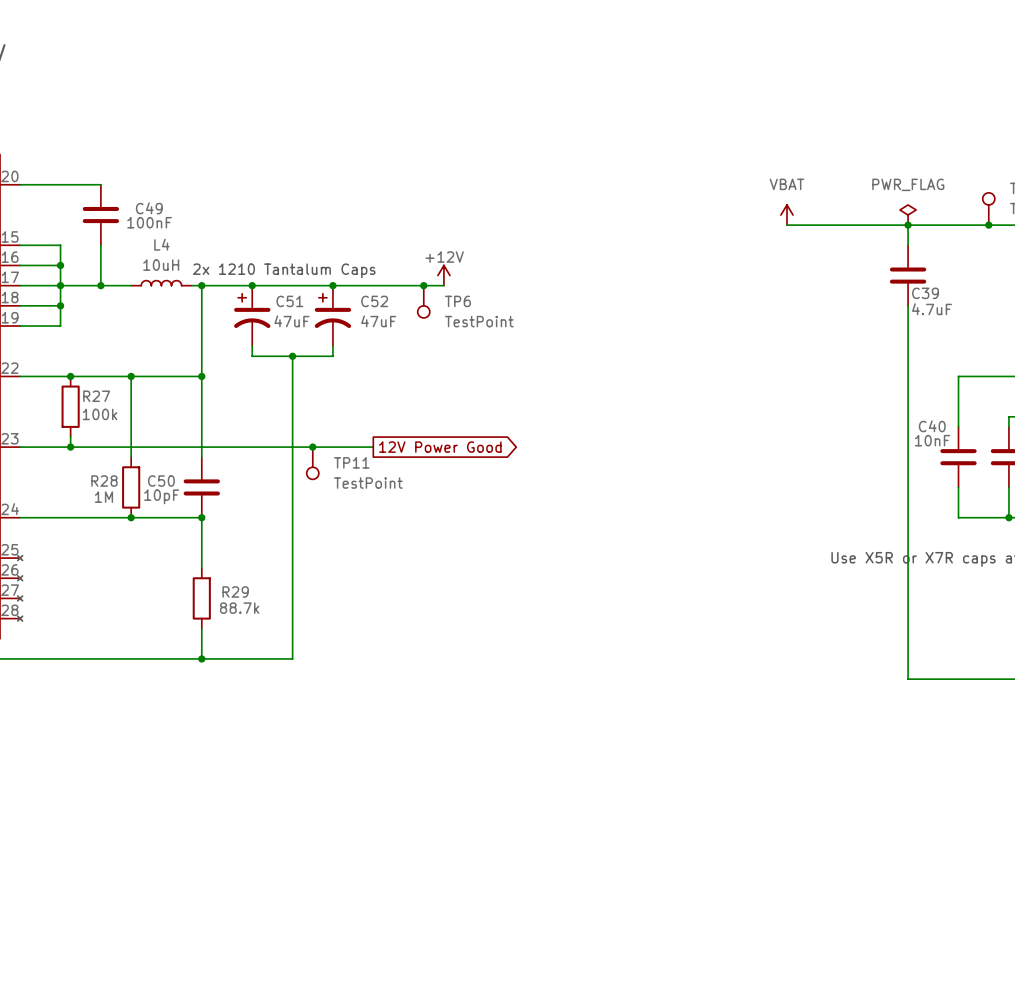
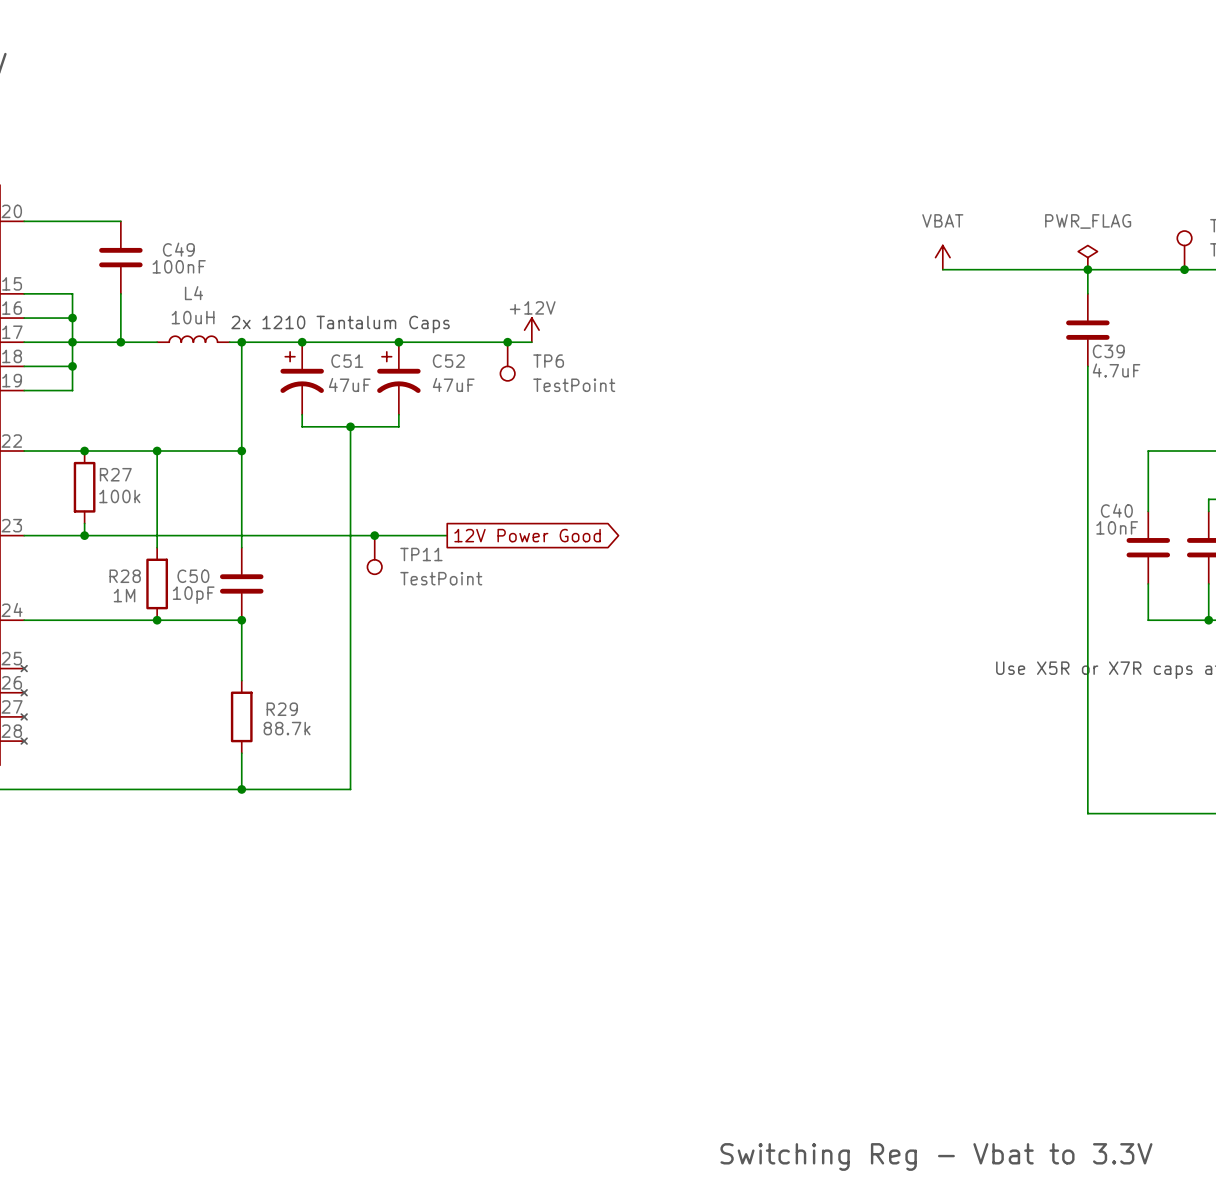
text: none -> Switching Reg - Vbat to 3.3V (936, 1156)

